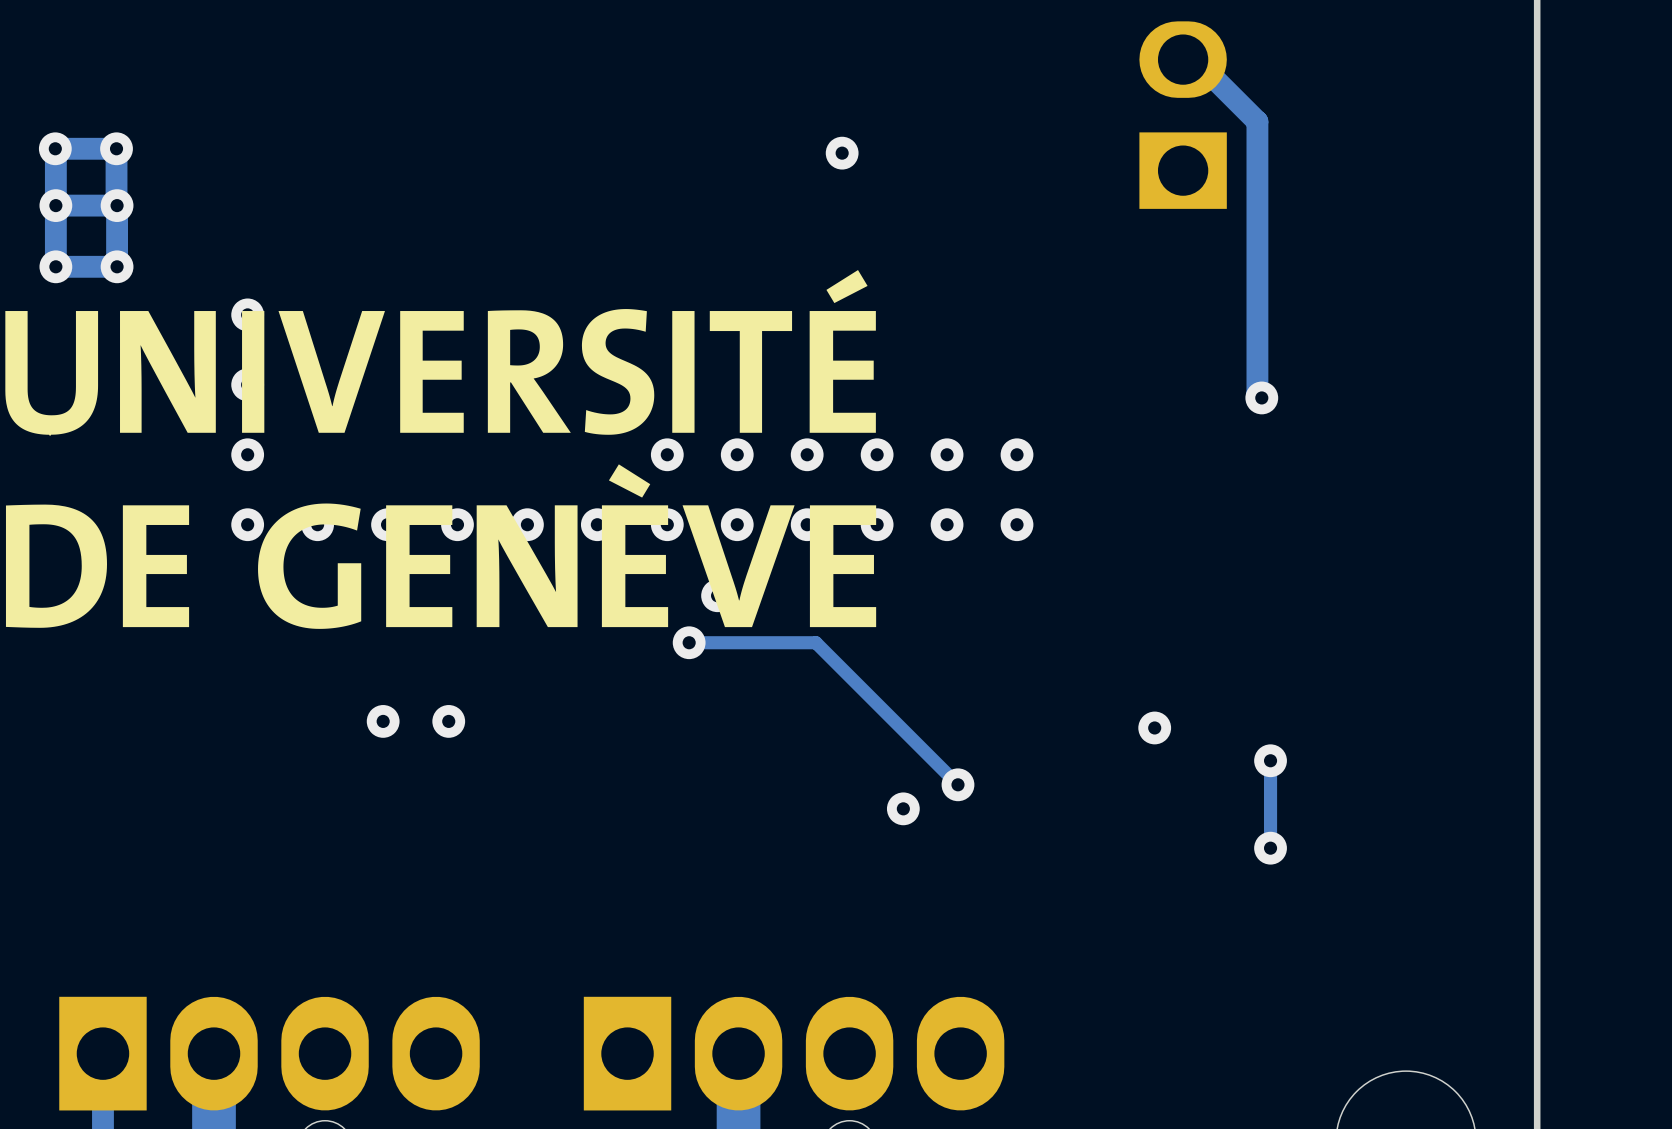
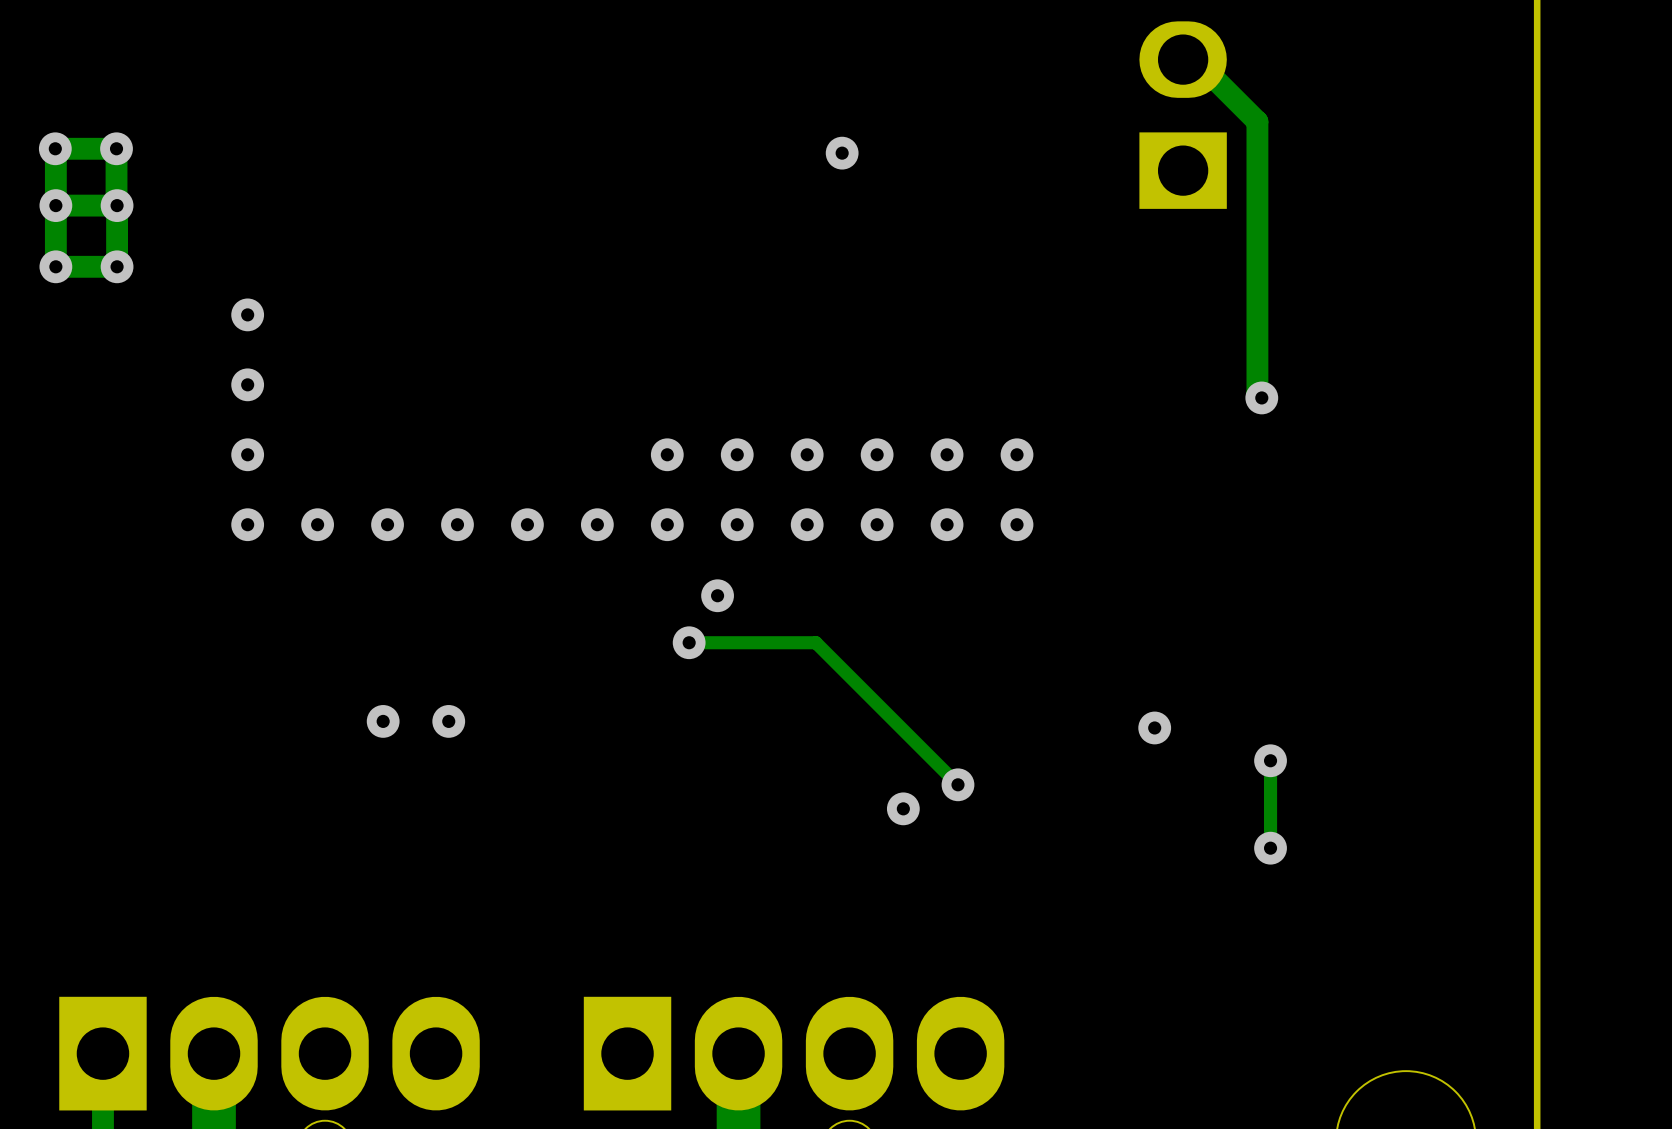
drawing: [5, 270, 877, 629] -> none
drawing: [5, 504, 190, 628] -> none

